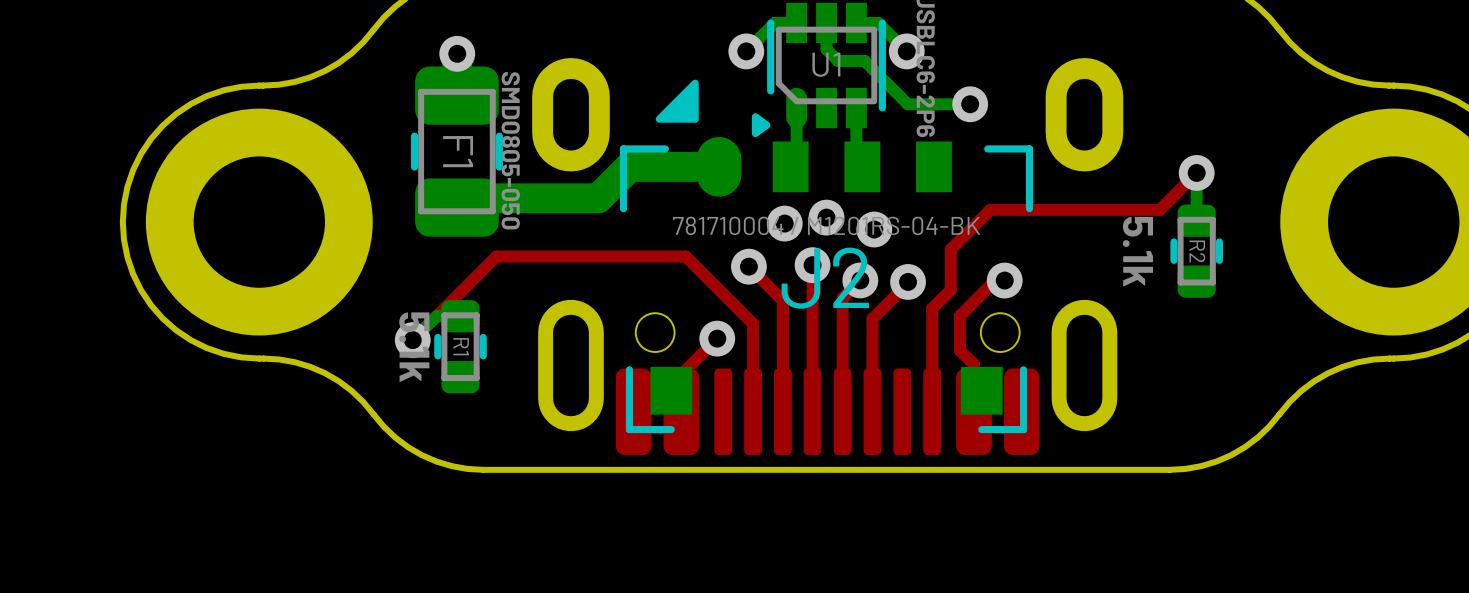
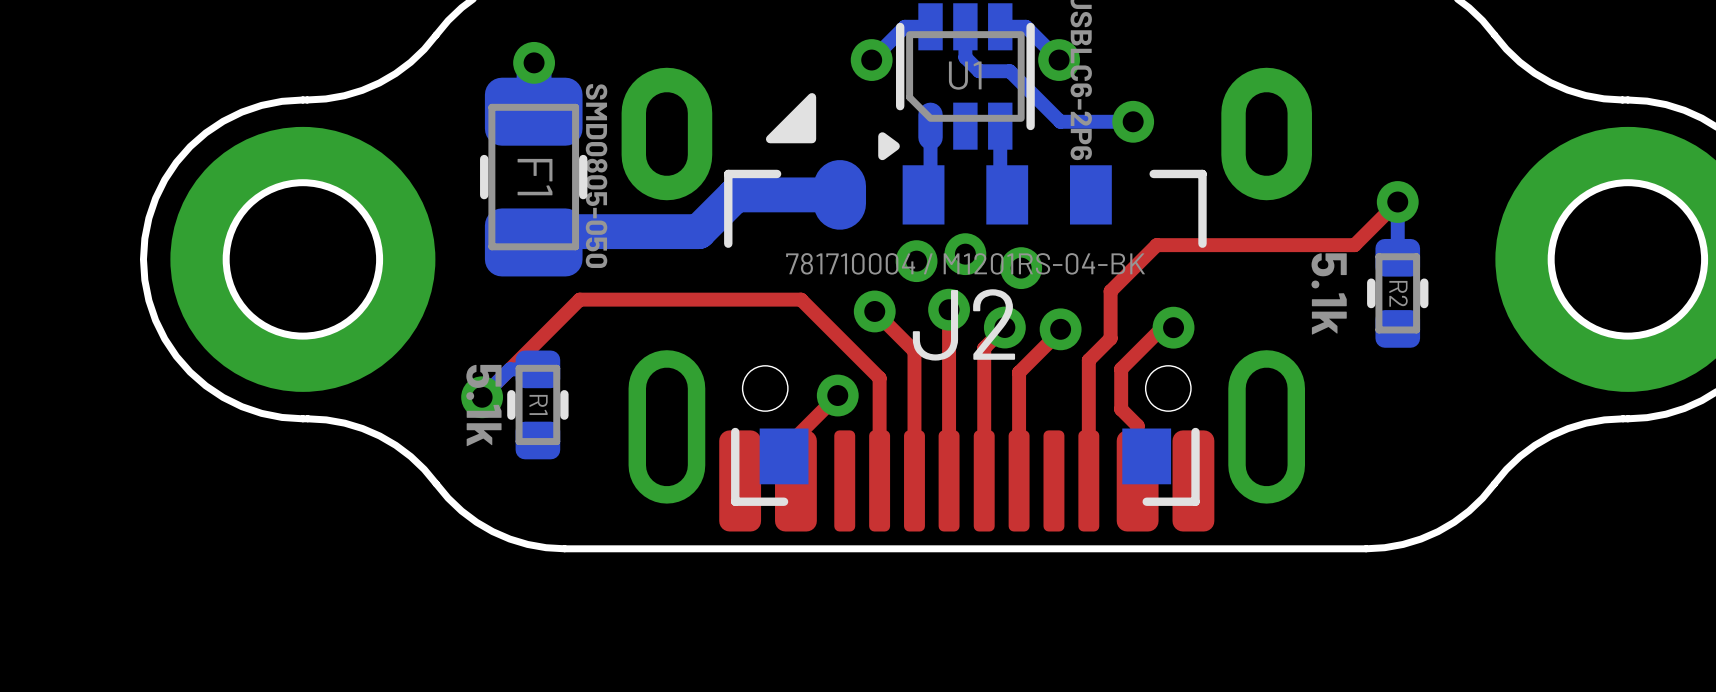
round board edge: none -> [222, 179, 384, 340]
round board edge: none -> [1547, 179, 1709, 340]

